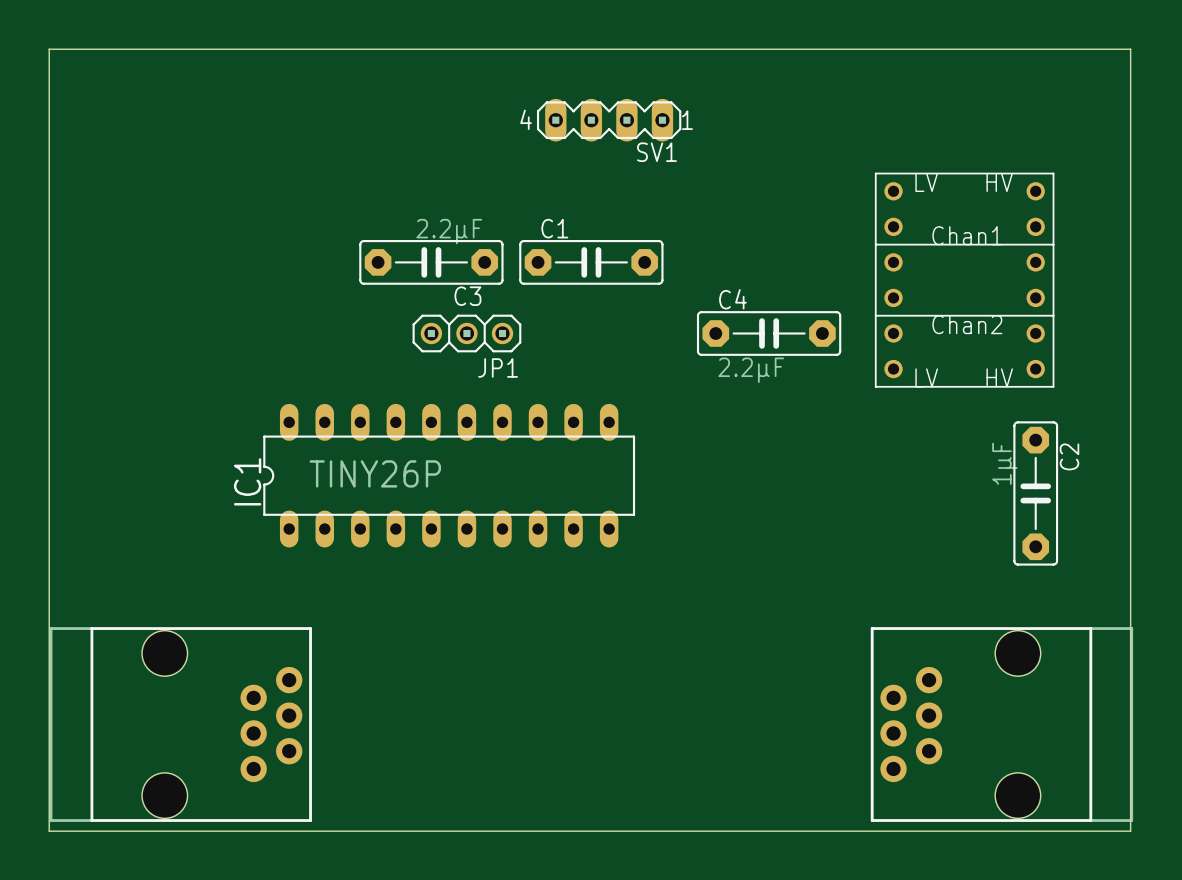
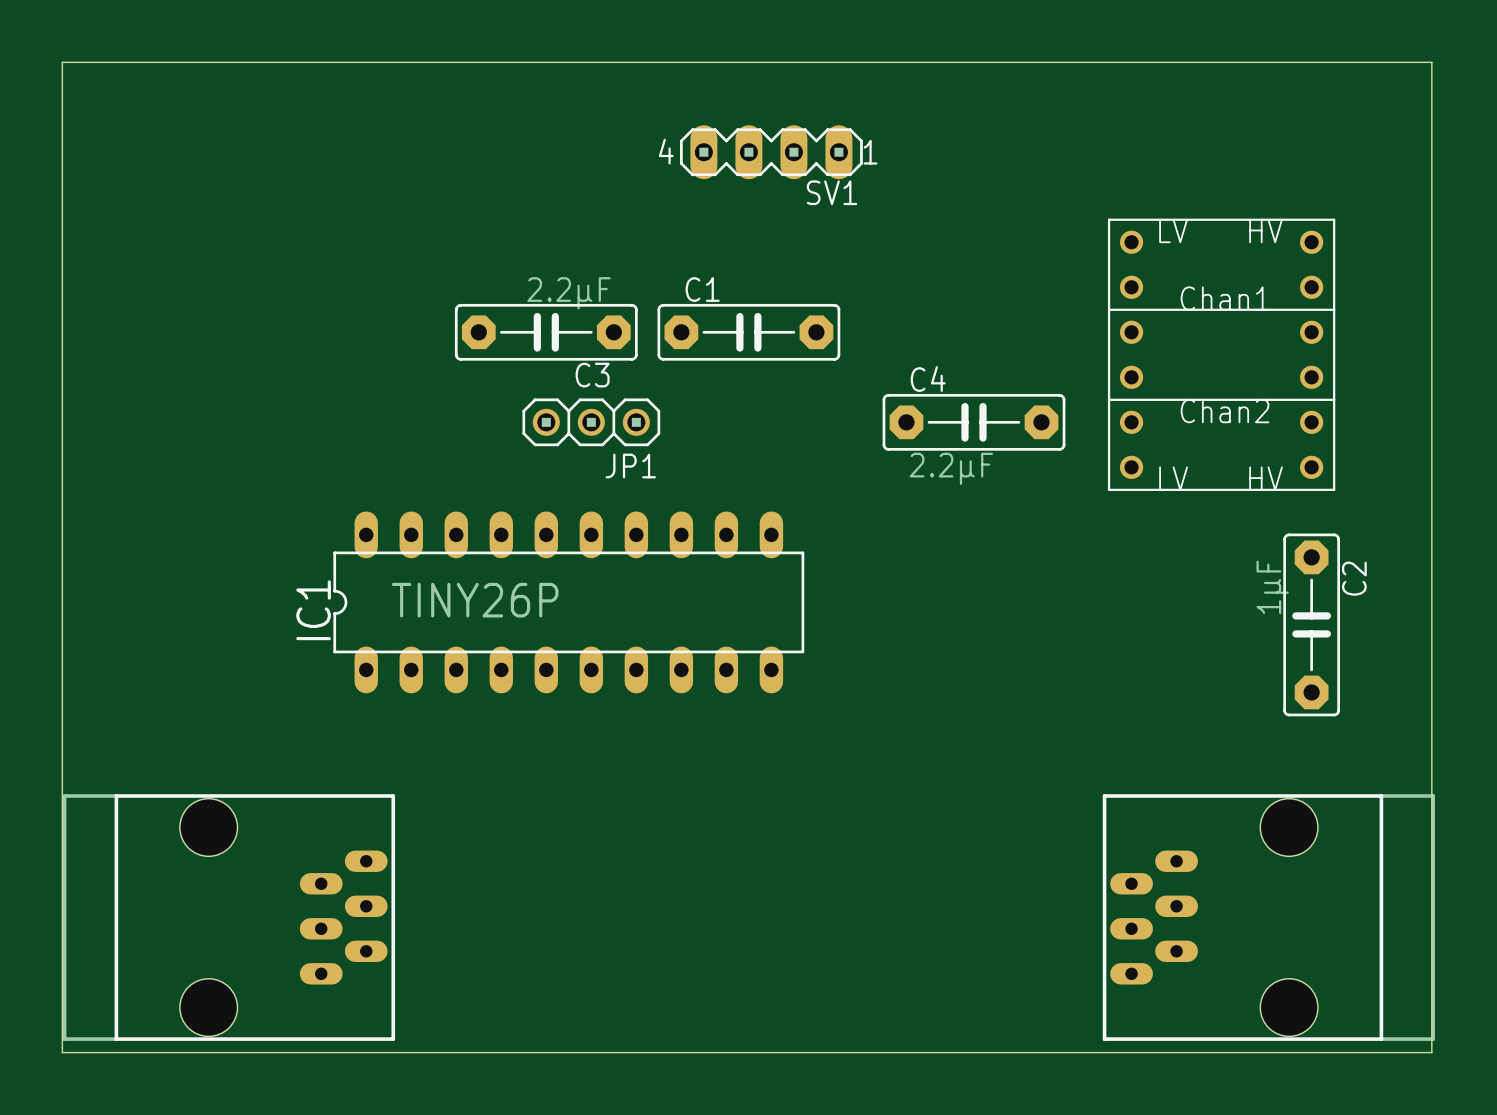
part footprint: [49, 627, 312, 822] -> [62, 794, 396, 1041]
part footprint: [870, 627, 1134, 822] -> [1102, 794, 1435, 1041]

